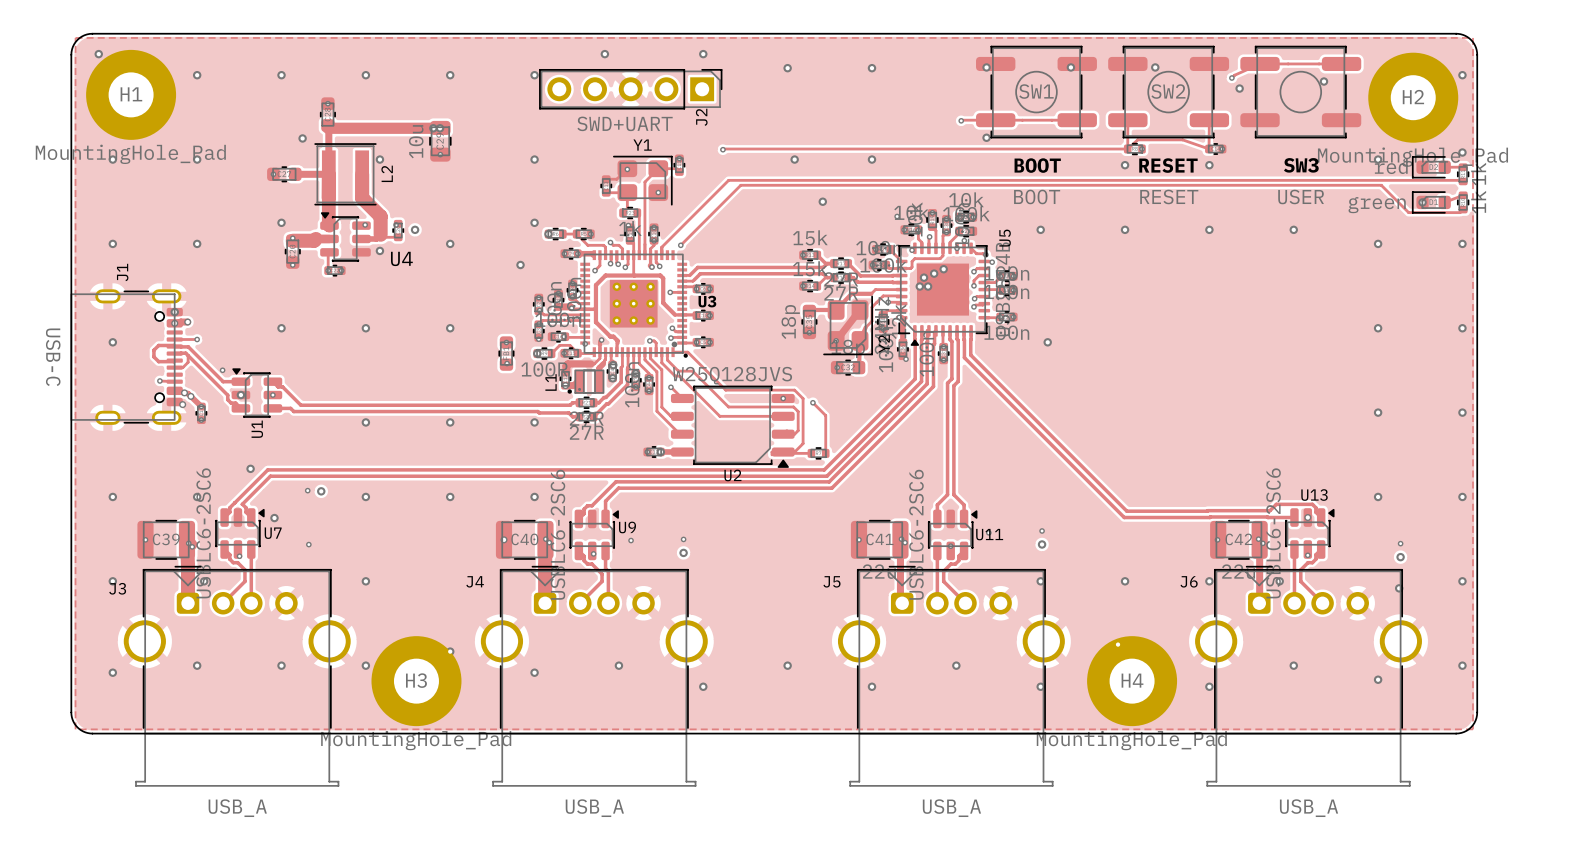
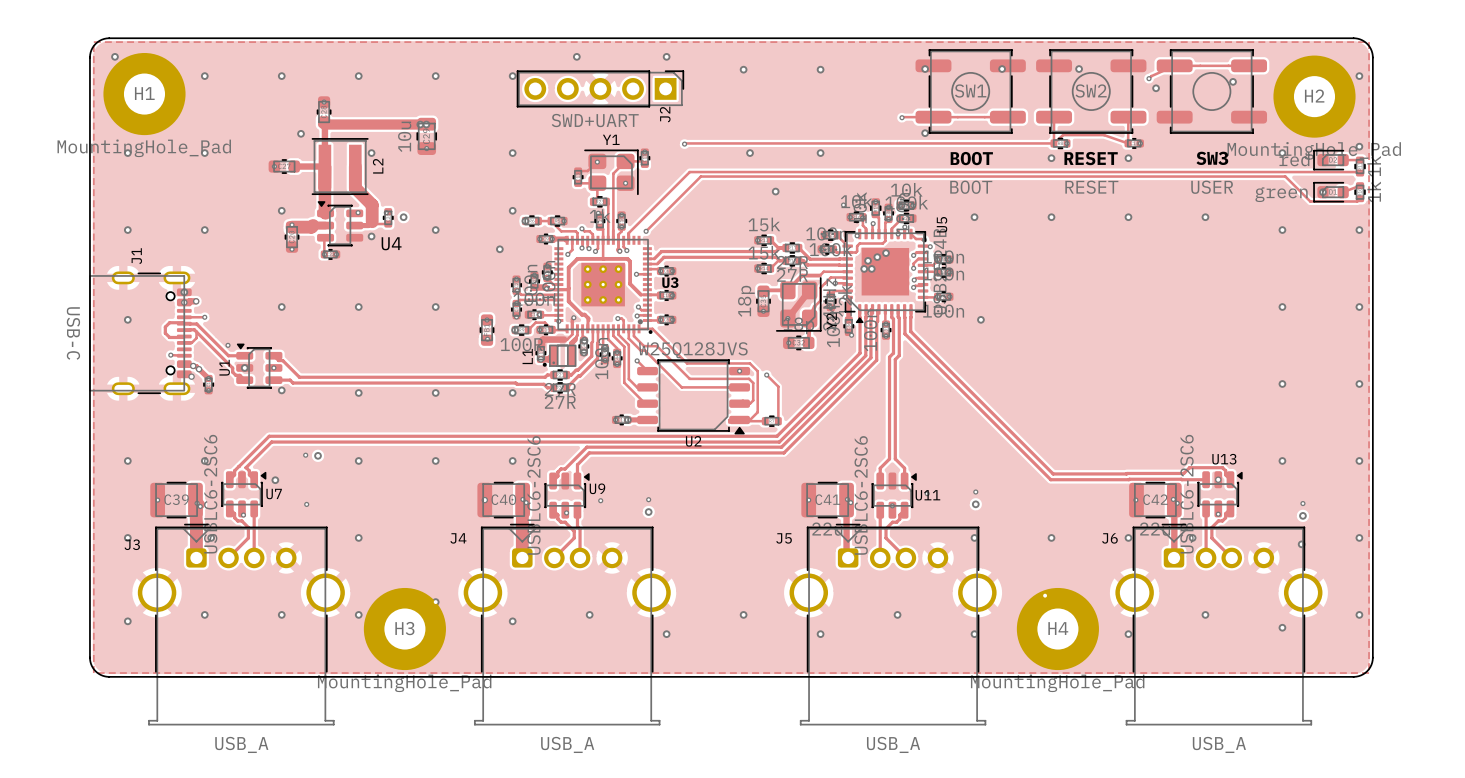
U1 name position: U1 (257, 429) -> U1 (224, 367)
via position: (250, 468) -> (281, 390)

